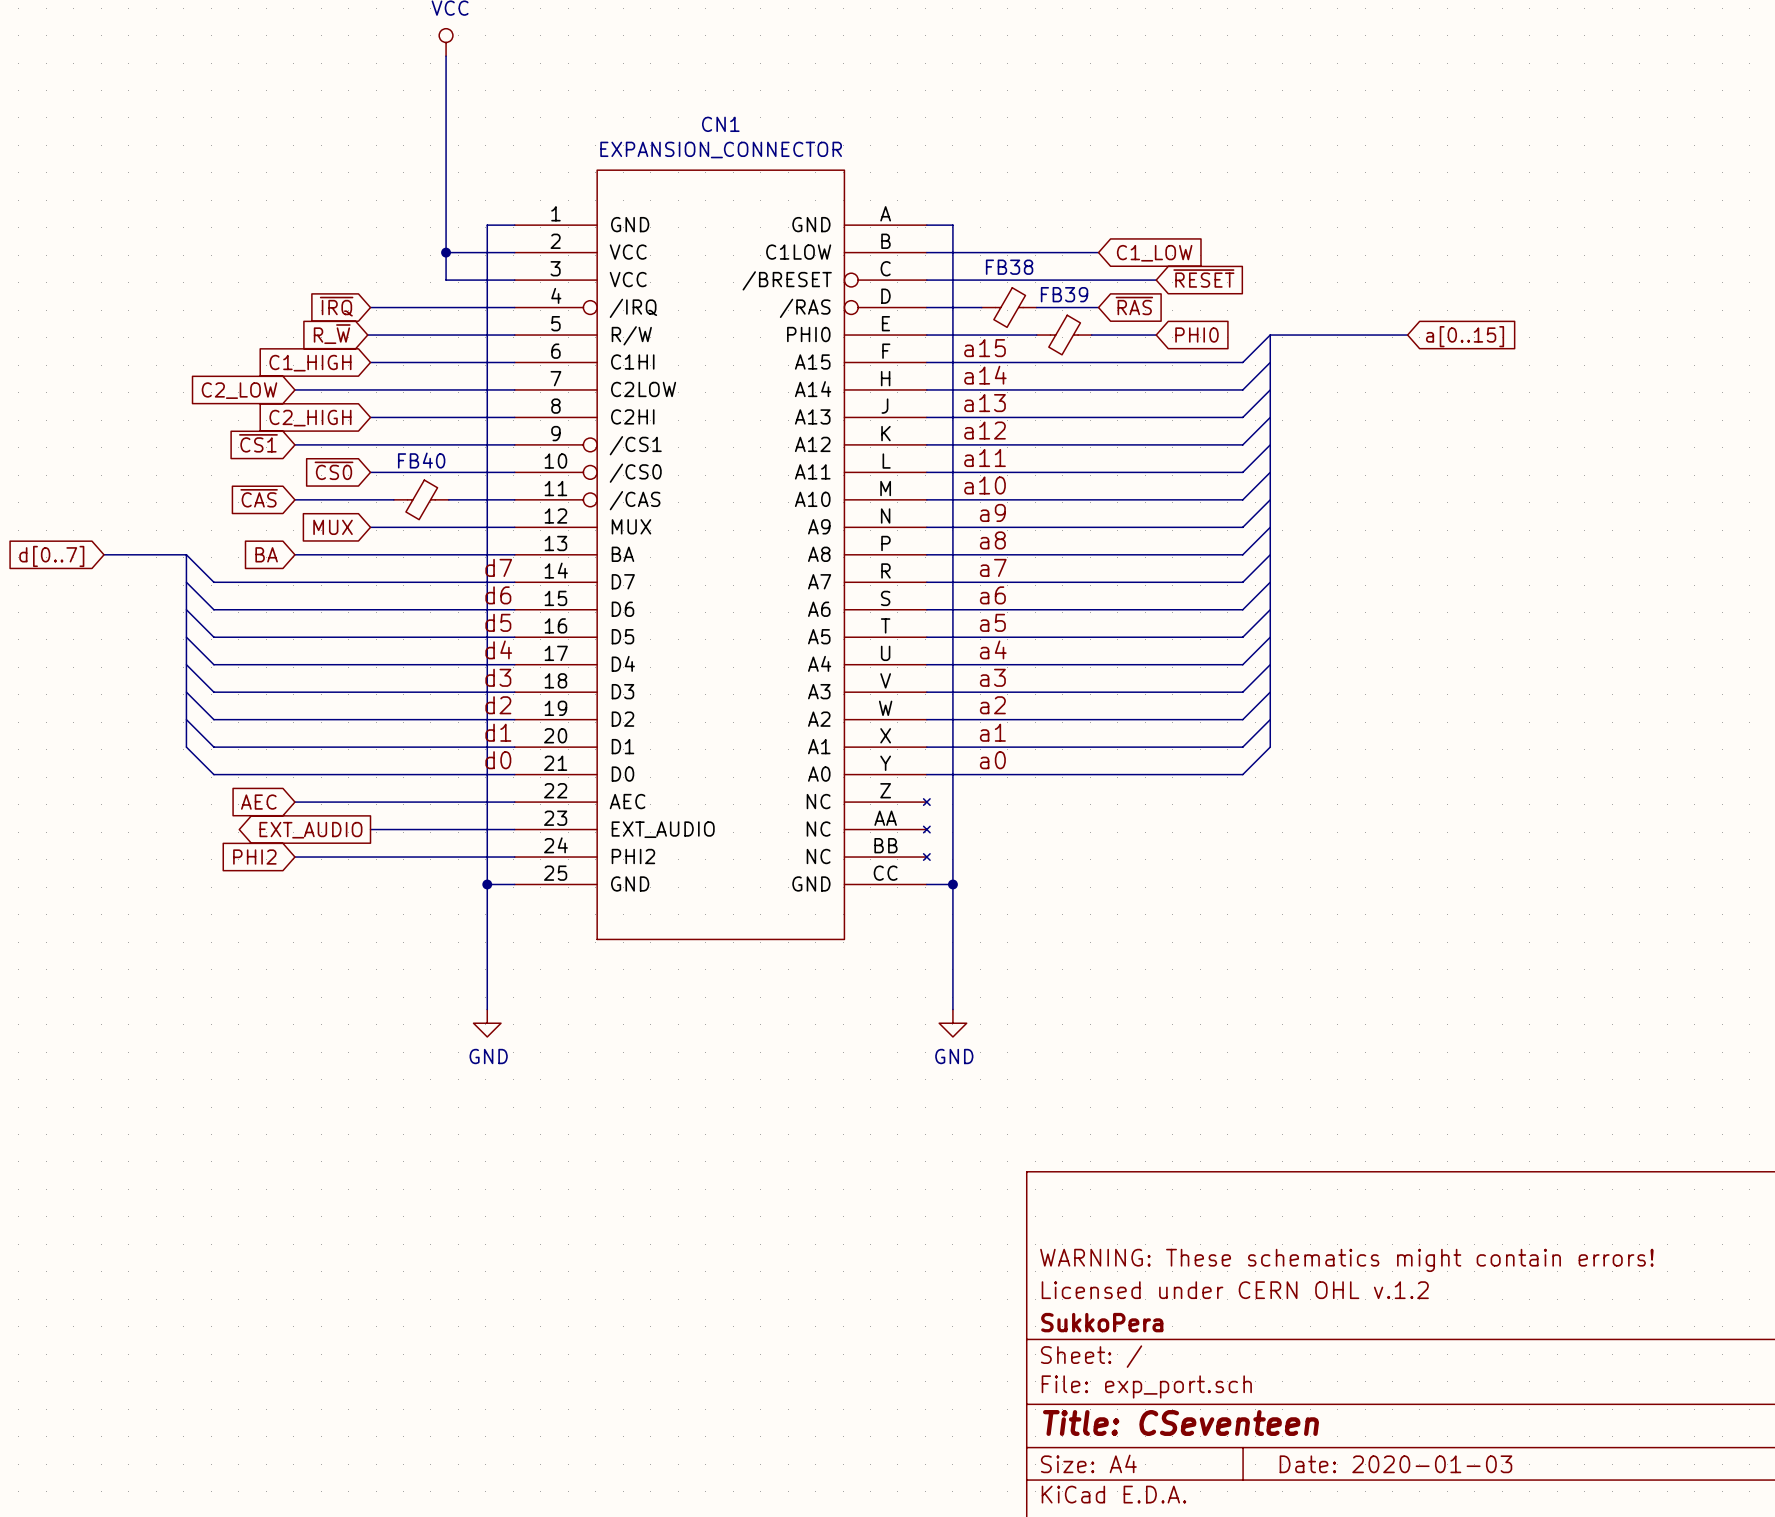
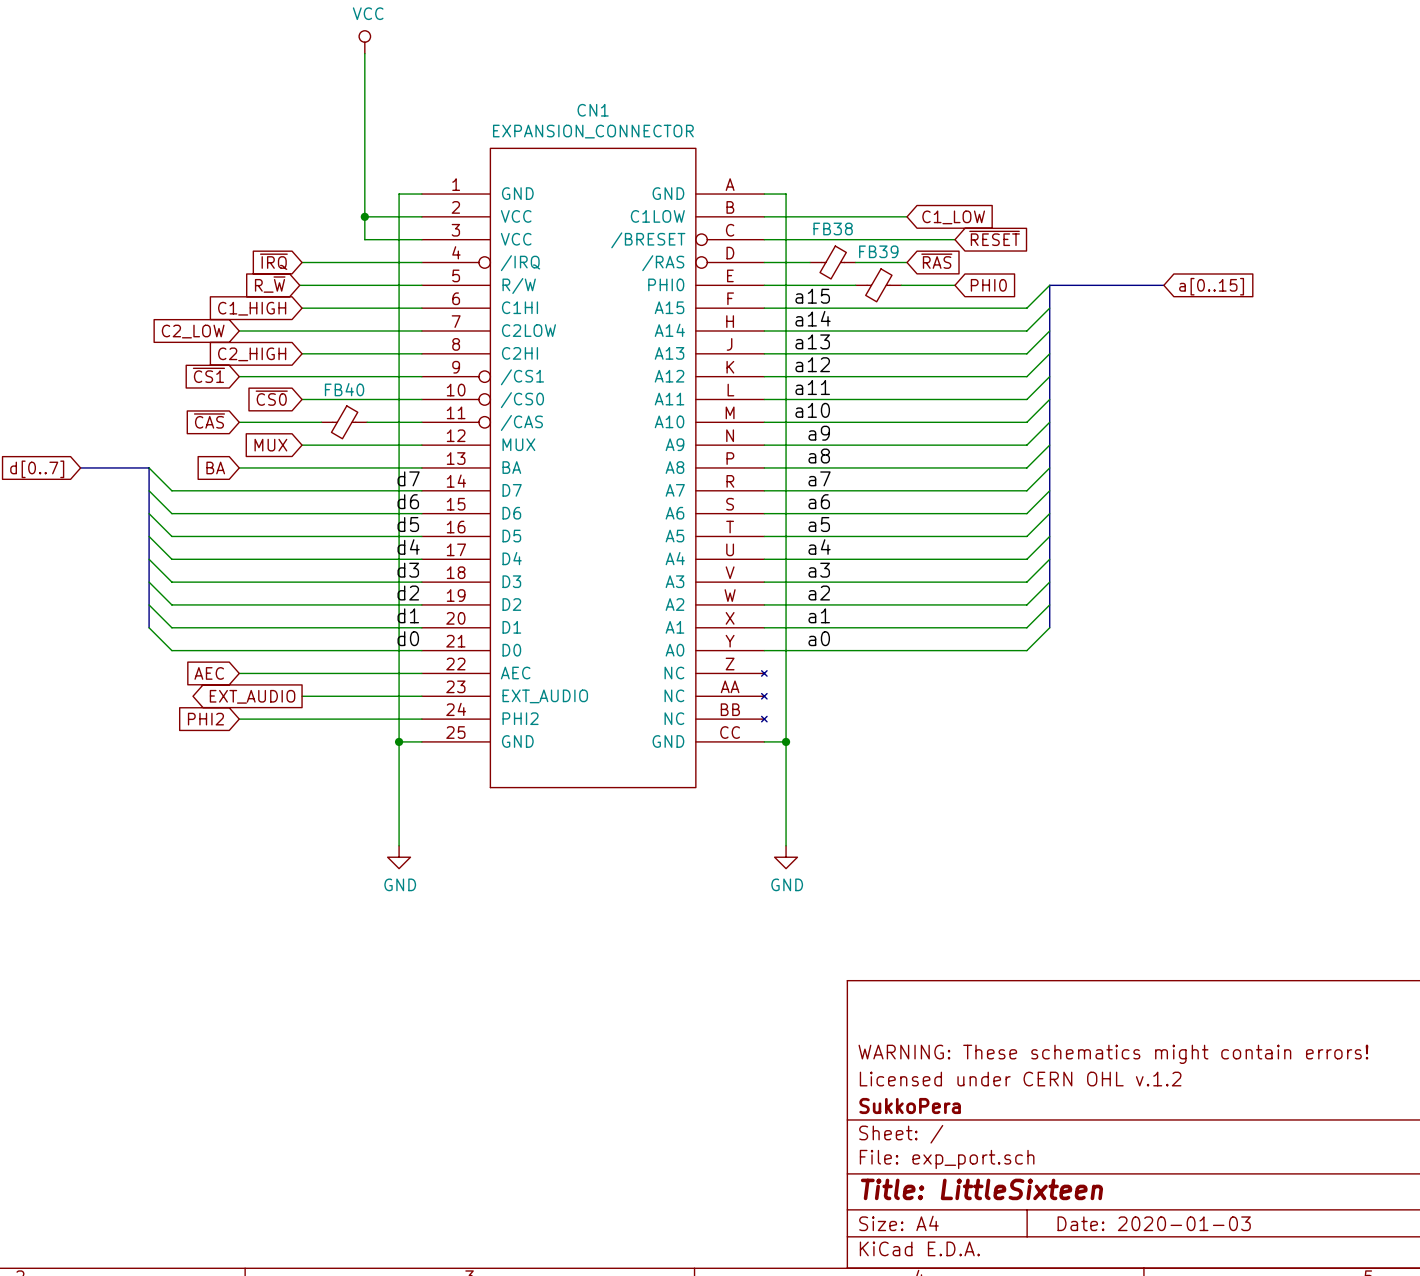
title block: Title: CSeventeen (1181, 1422) -> Title: LittleSixteen (981, 1189)

